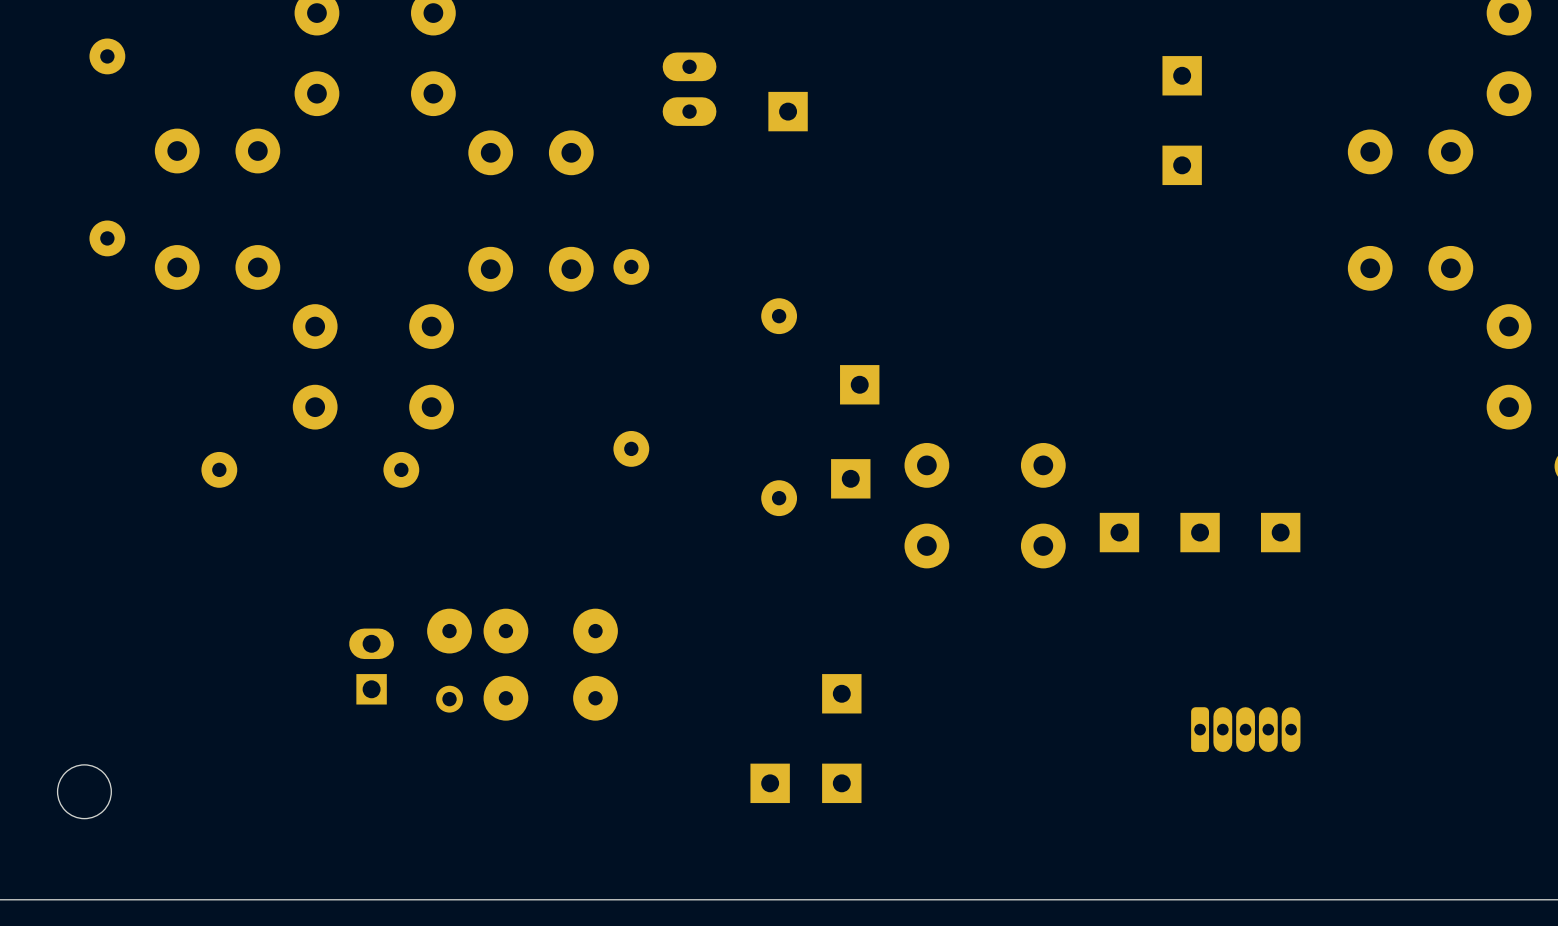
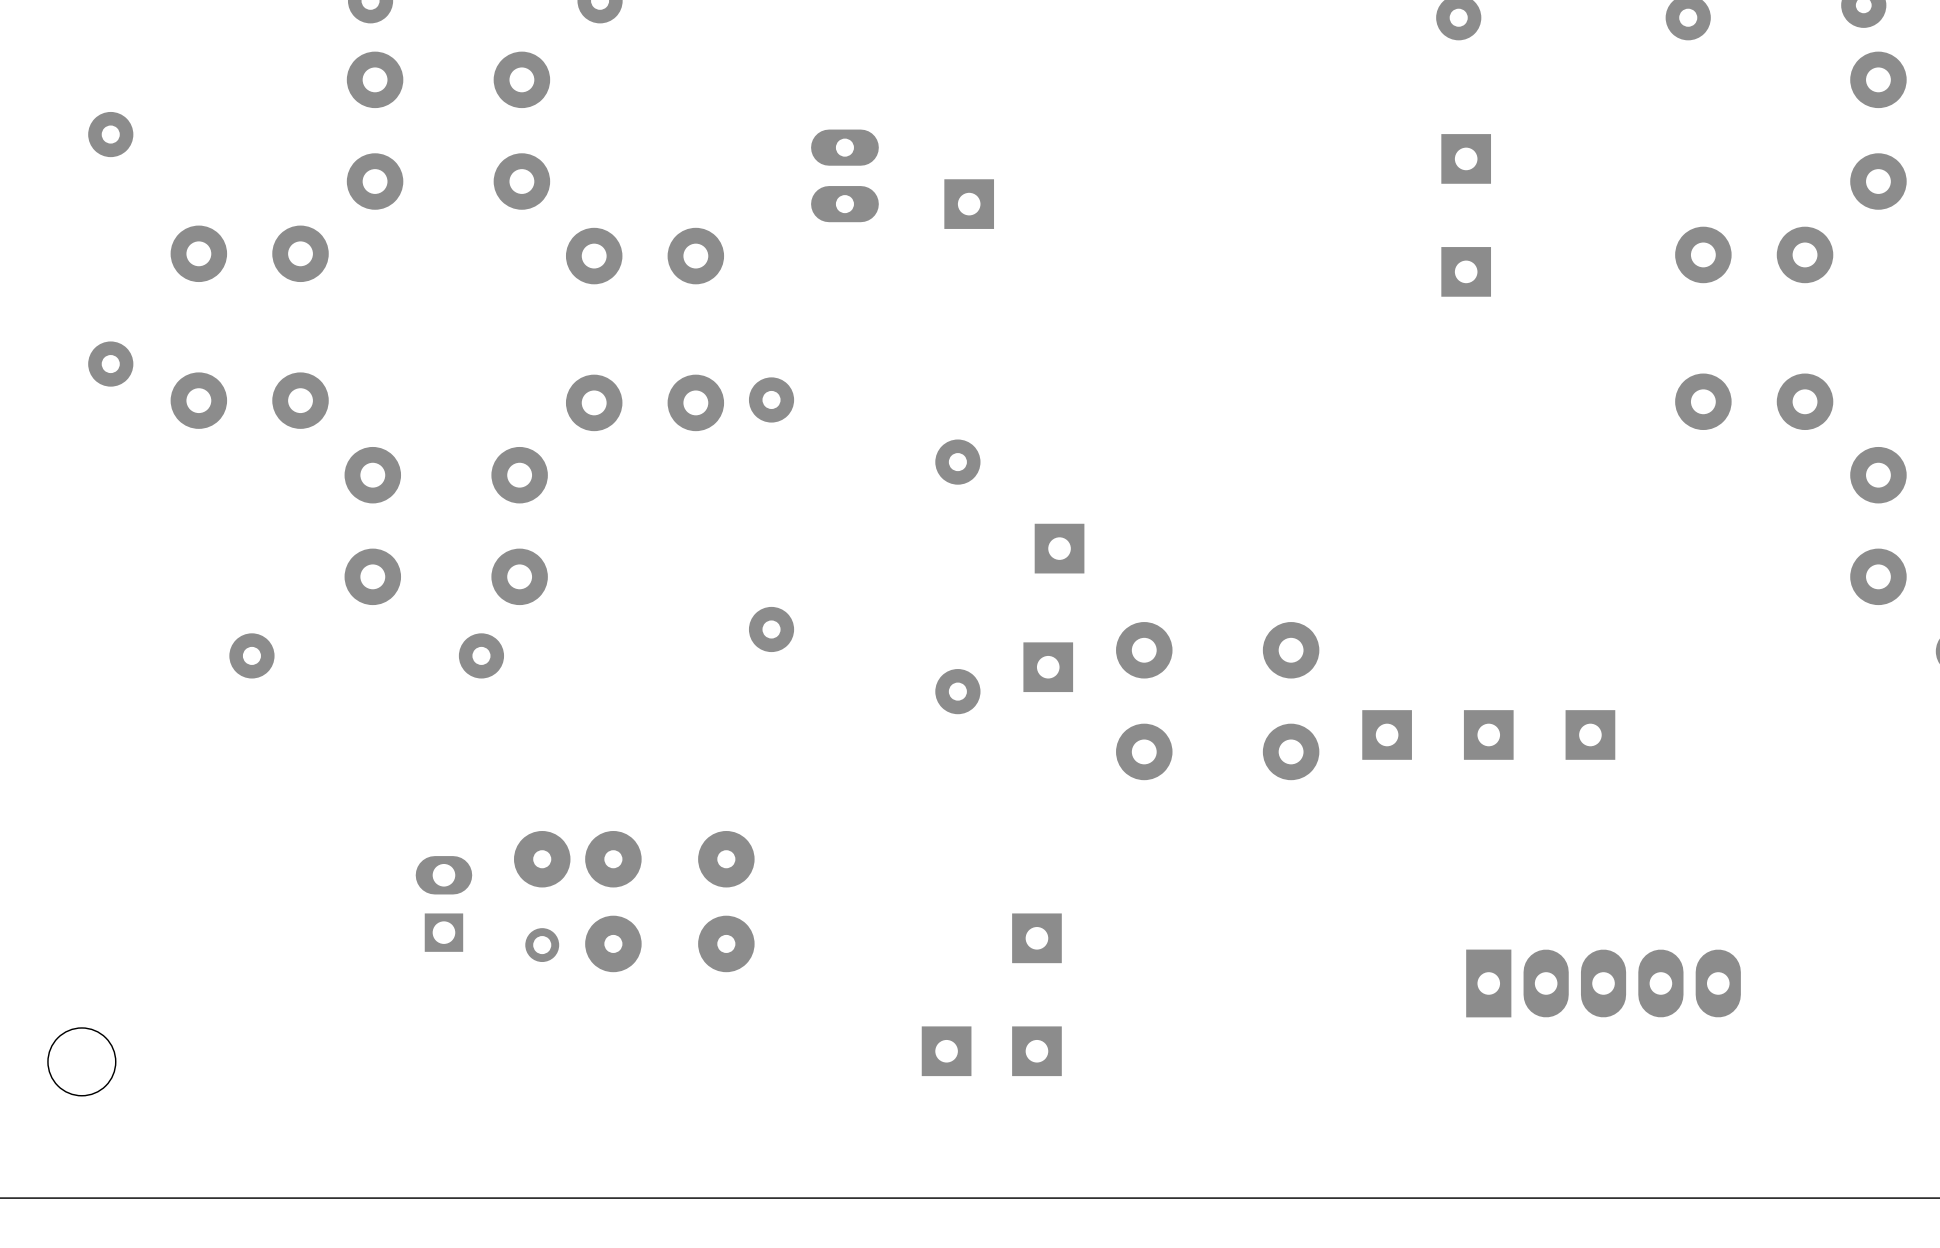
part: (1245, 729) -> none
part: none -> (1603, 983)

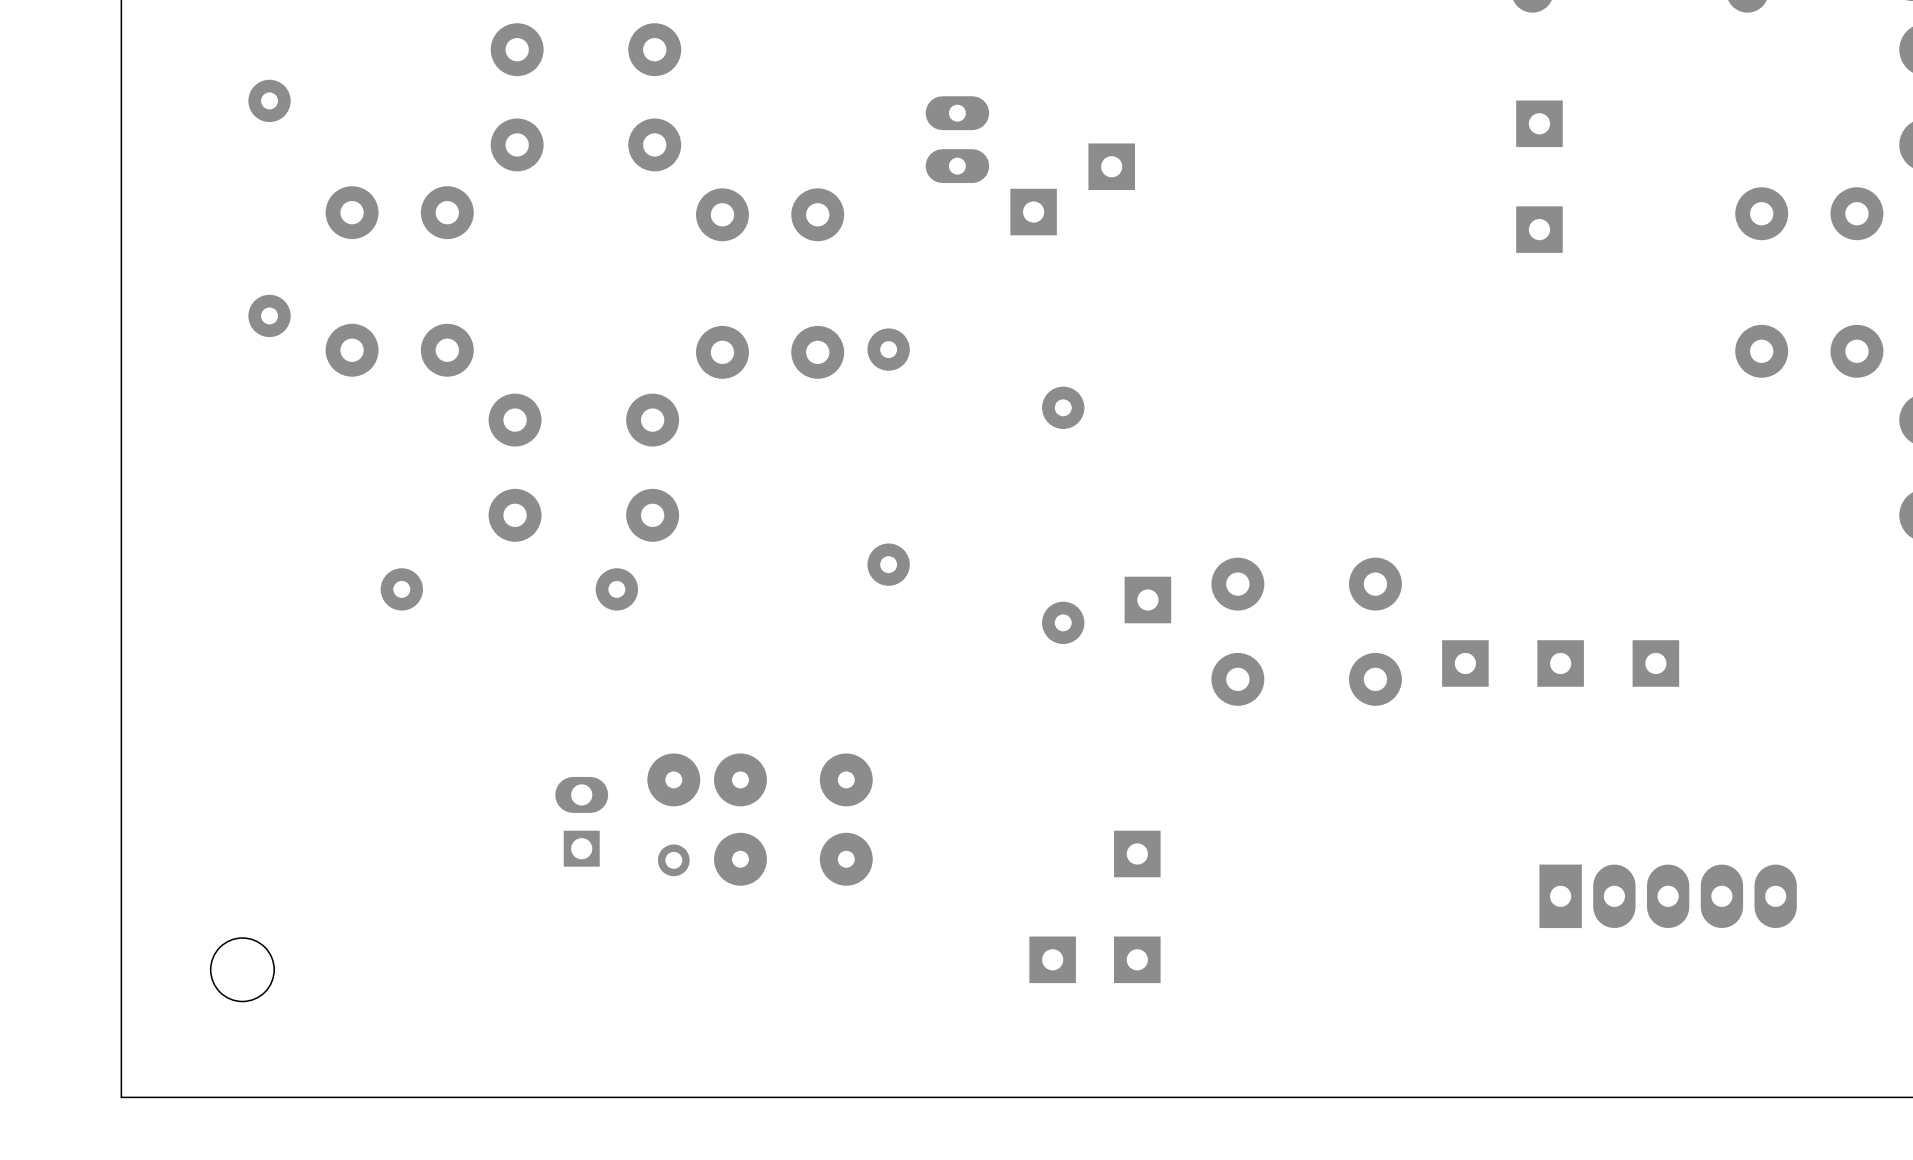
part: (969, 204) -> none
part: none -> (1111, 166)
part: none -> (1033, 212)
part: (1059, 548) -> none

